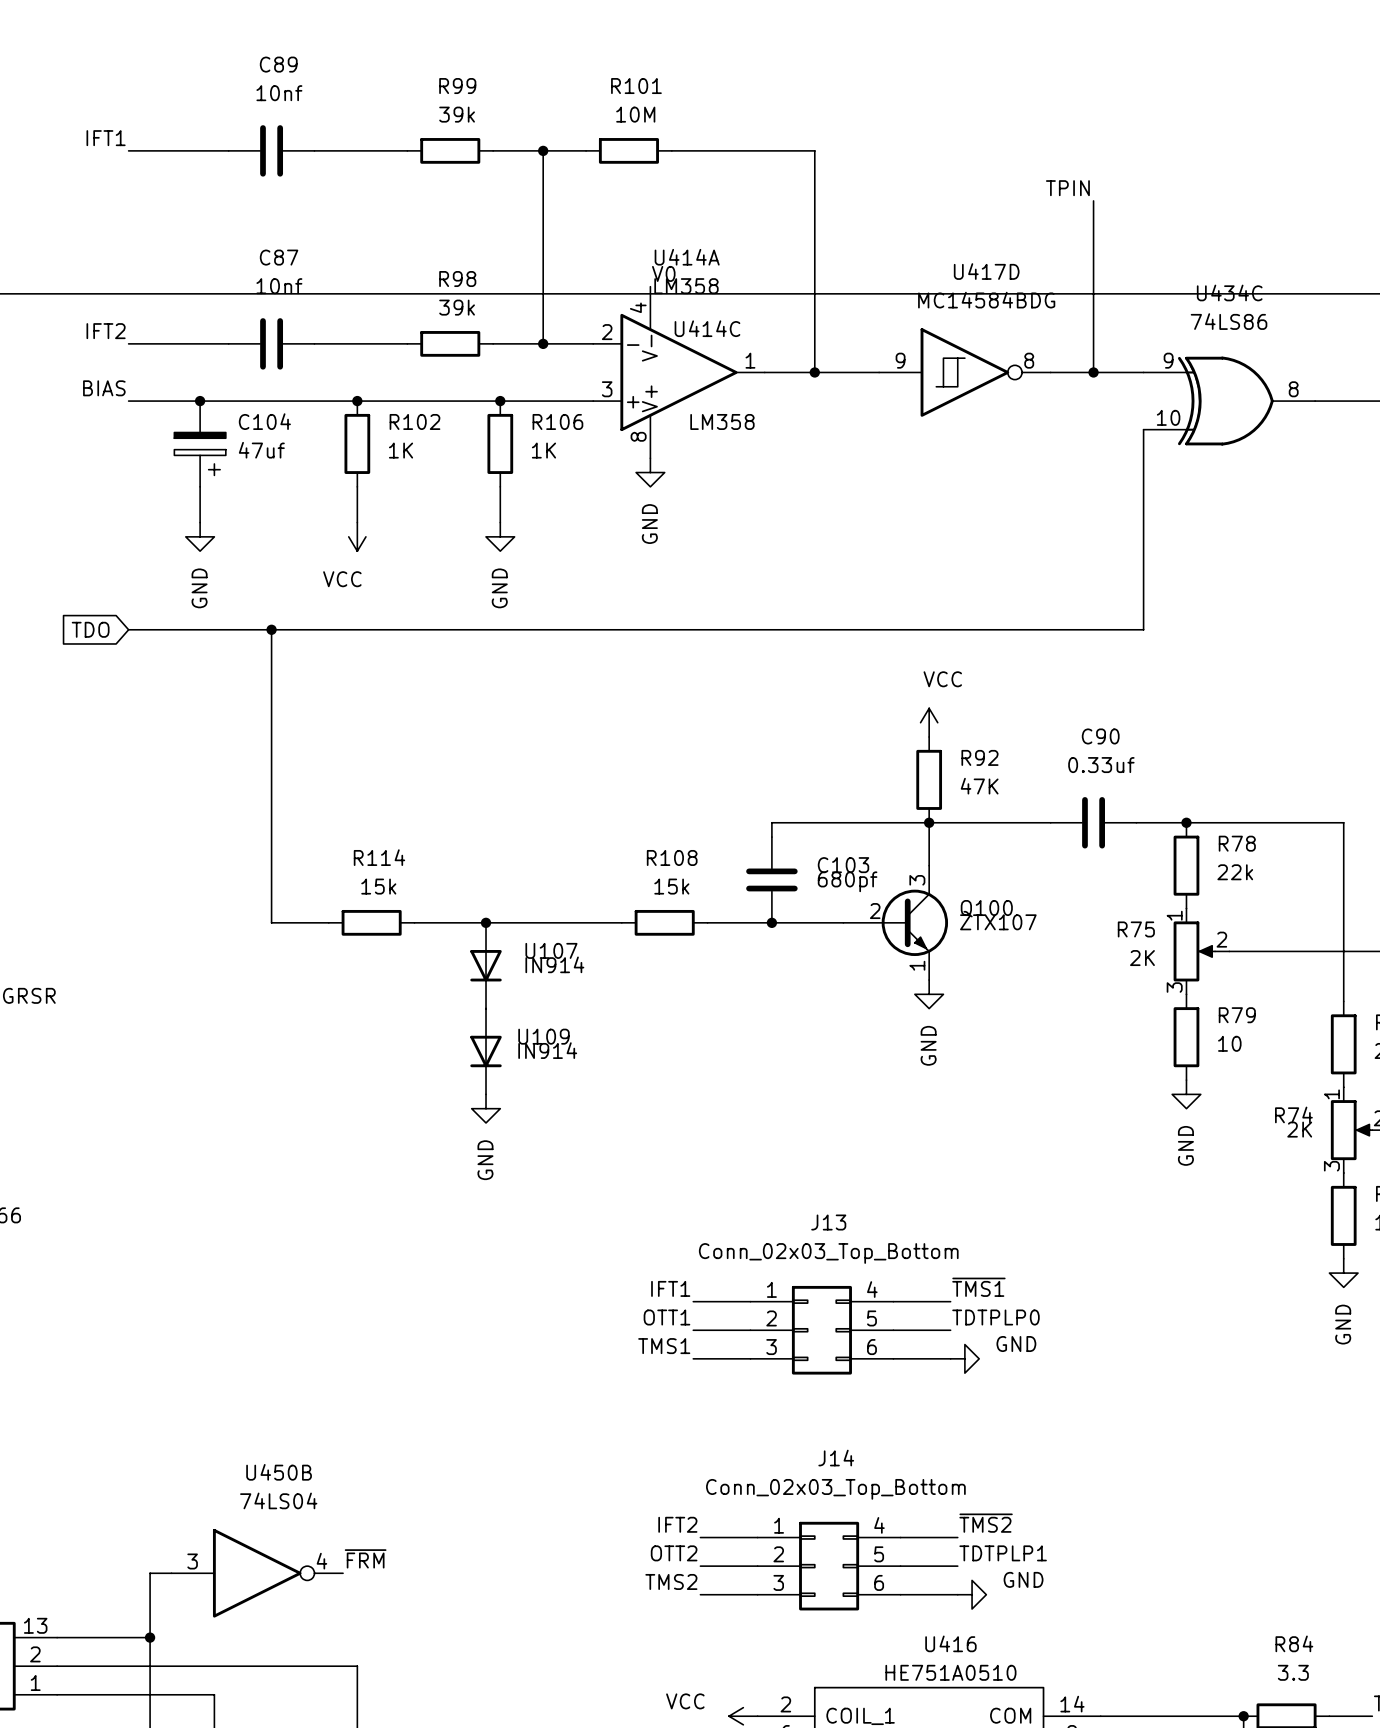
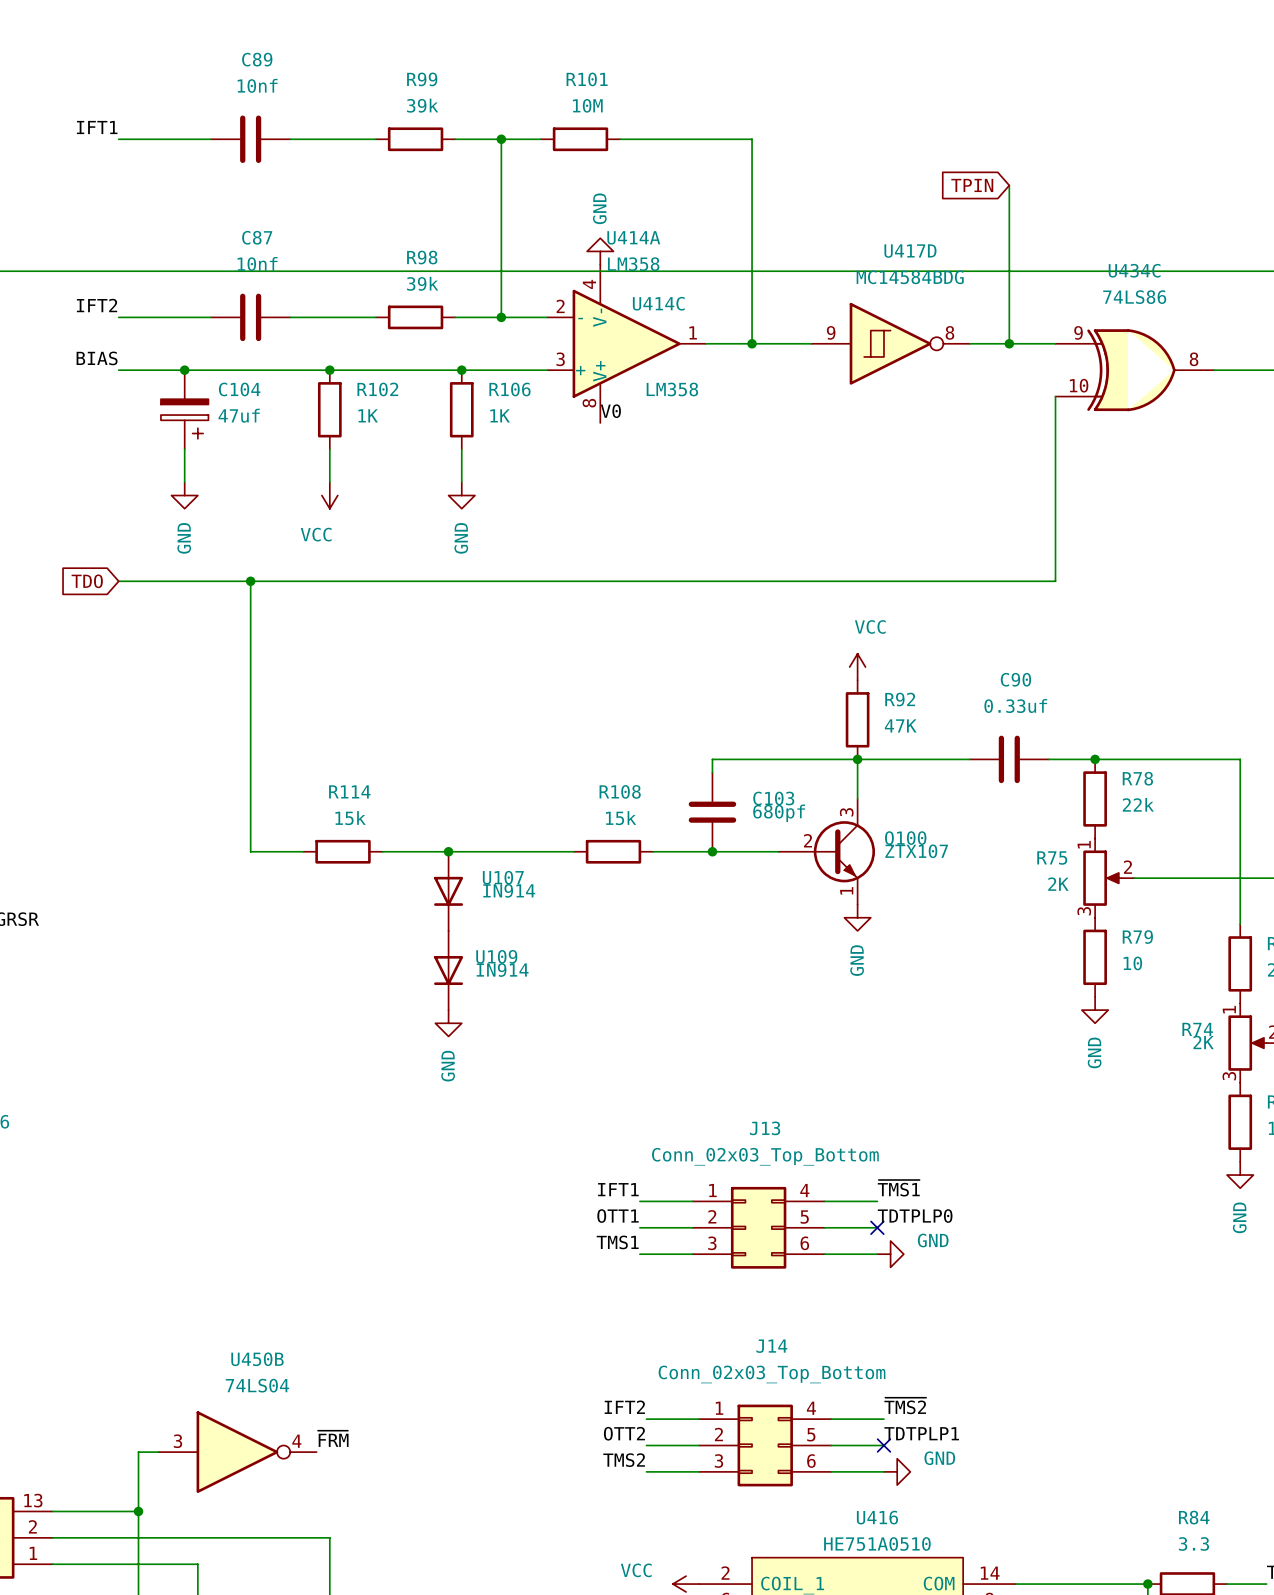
label: TPIN (1067, 188) -> none
global label: none -> TPIN (972, 185)
label position: V0 (663, 273) -> V0 (610, 411)
power symbol rotation: 0° (650, 472) -> 180° (600, 251)
power symbol position: GND (650, 472) -> GND (600, 251)
no-connect mark: none -> (877, 1227)
no-connect mark: none -> (883, 1445)

